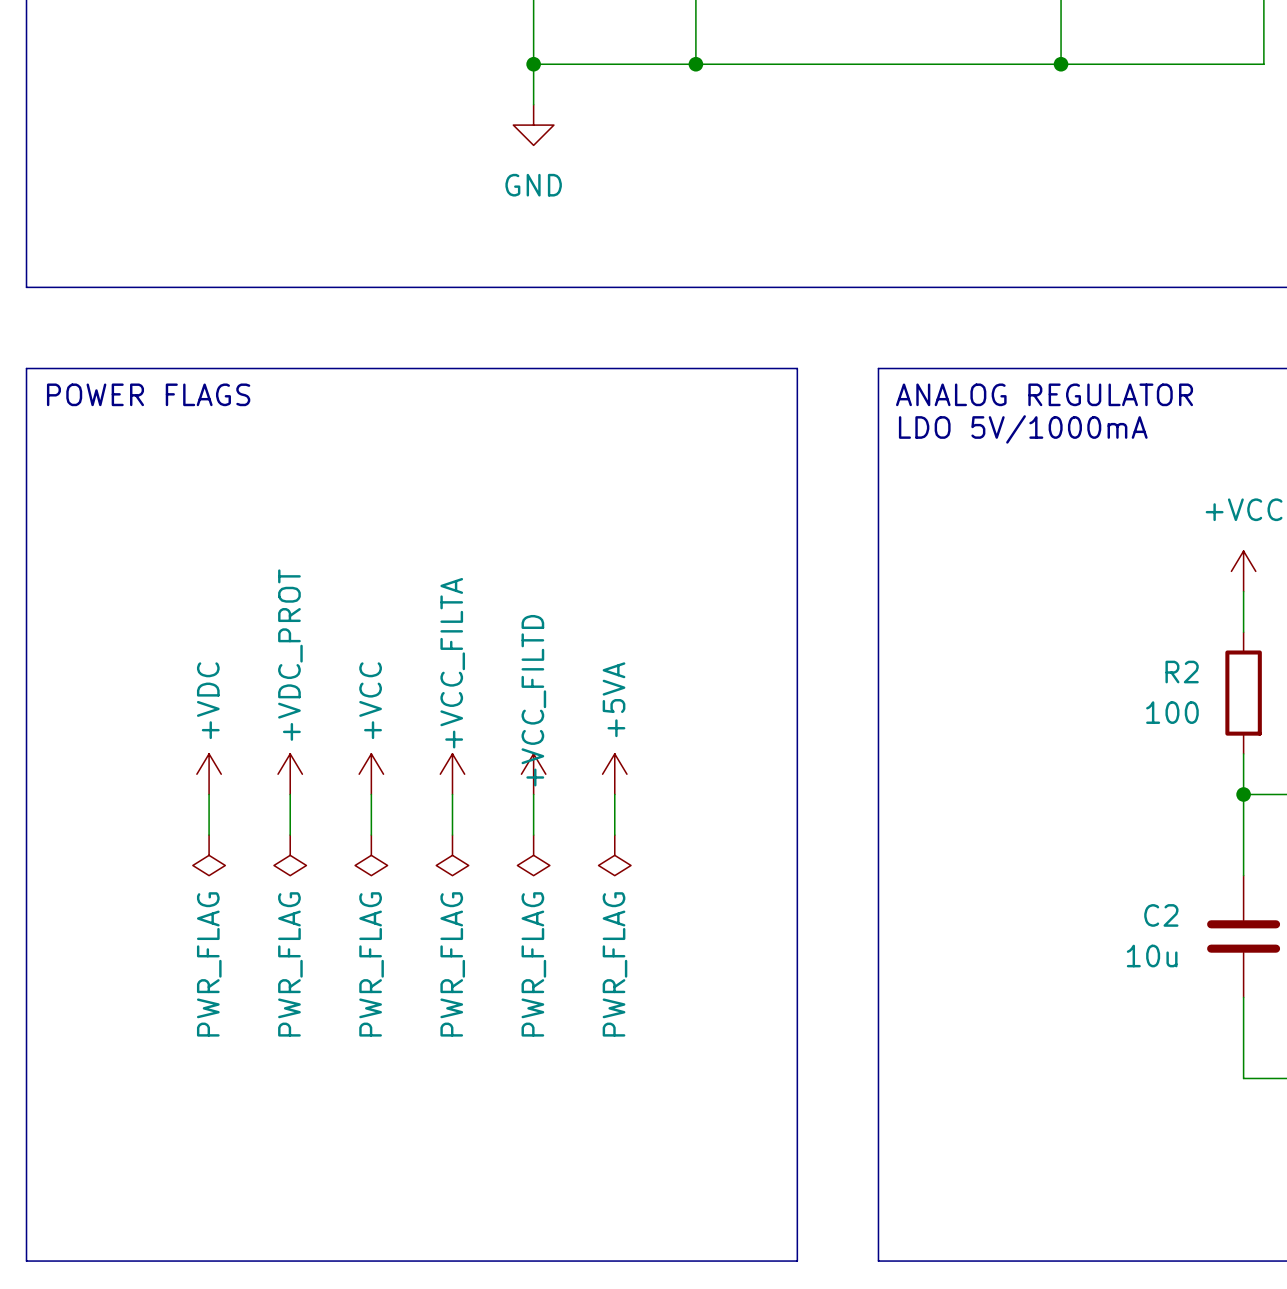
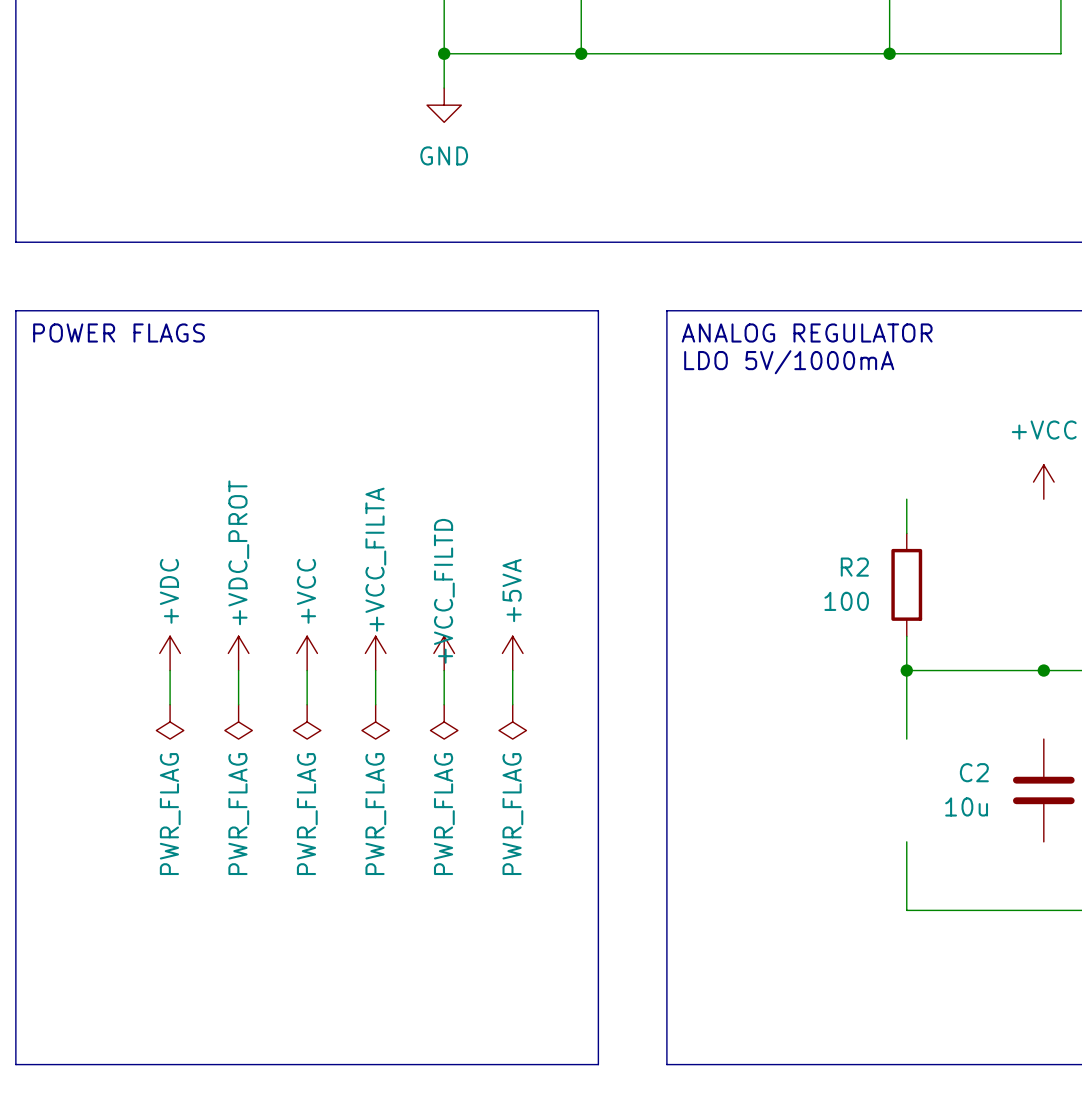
line: (716, 368) (797, 368) -> (735, 310) (666, 310)
line: (878, 368) (878, 1261) -> (598, 310) (598, 1064)
text position: ANALOG REGULATOR (1044, 394) -> ANALOG REGULATOR (807, 332)
text position: LDO 5V/1000mA (1023, 429) -> LDO 5V/1000mA (789, 362)
wire: (1243, 591) (1243, 632) -> (906, 499) (906, 533)
R2 position: (1243, 693) -> (906, 584)
wire: (1243, 753) (1243, 875) -> (906, 636) (906, 739)
wire: none -> (906, 670) (1043, 670)
junction: none -> (906, 670)
wire: (1243, 997) (1243, 1078) -> (906, 841) (906, 910) (1043, 910)
line: (716, 1261) (797, 1261) -> (735, 1064) (666, 1064)

